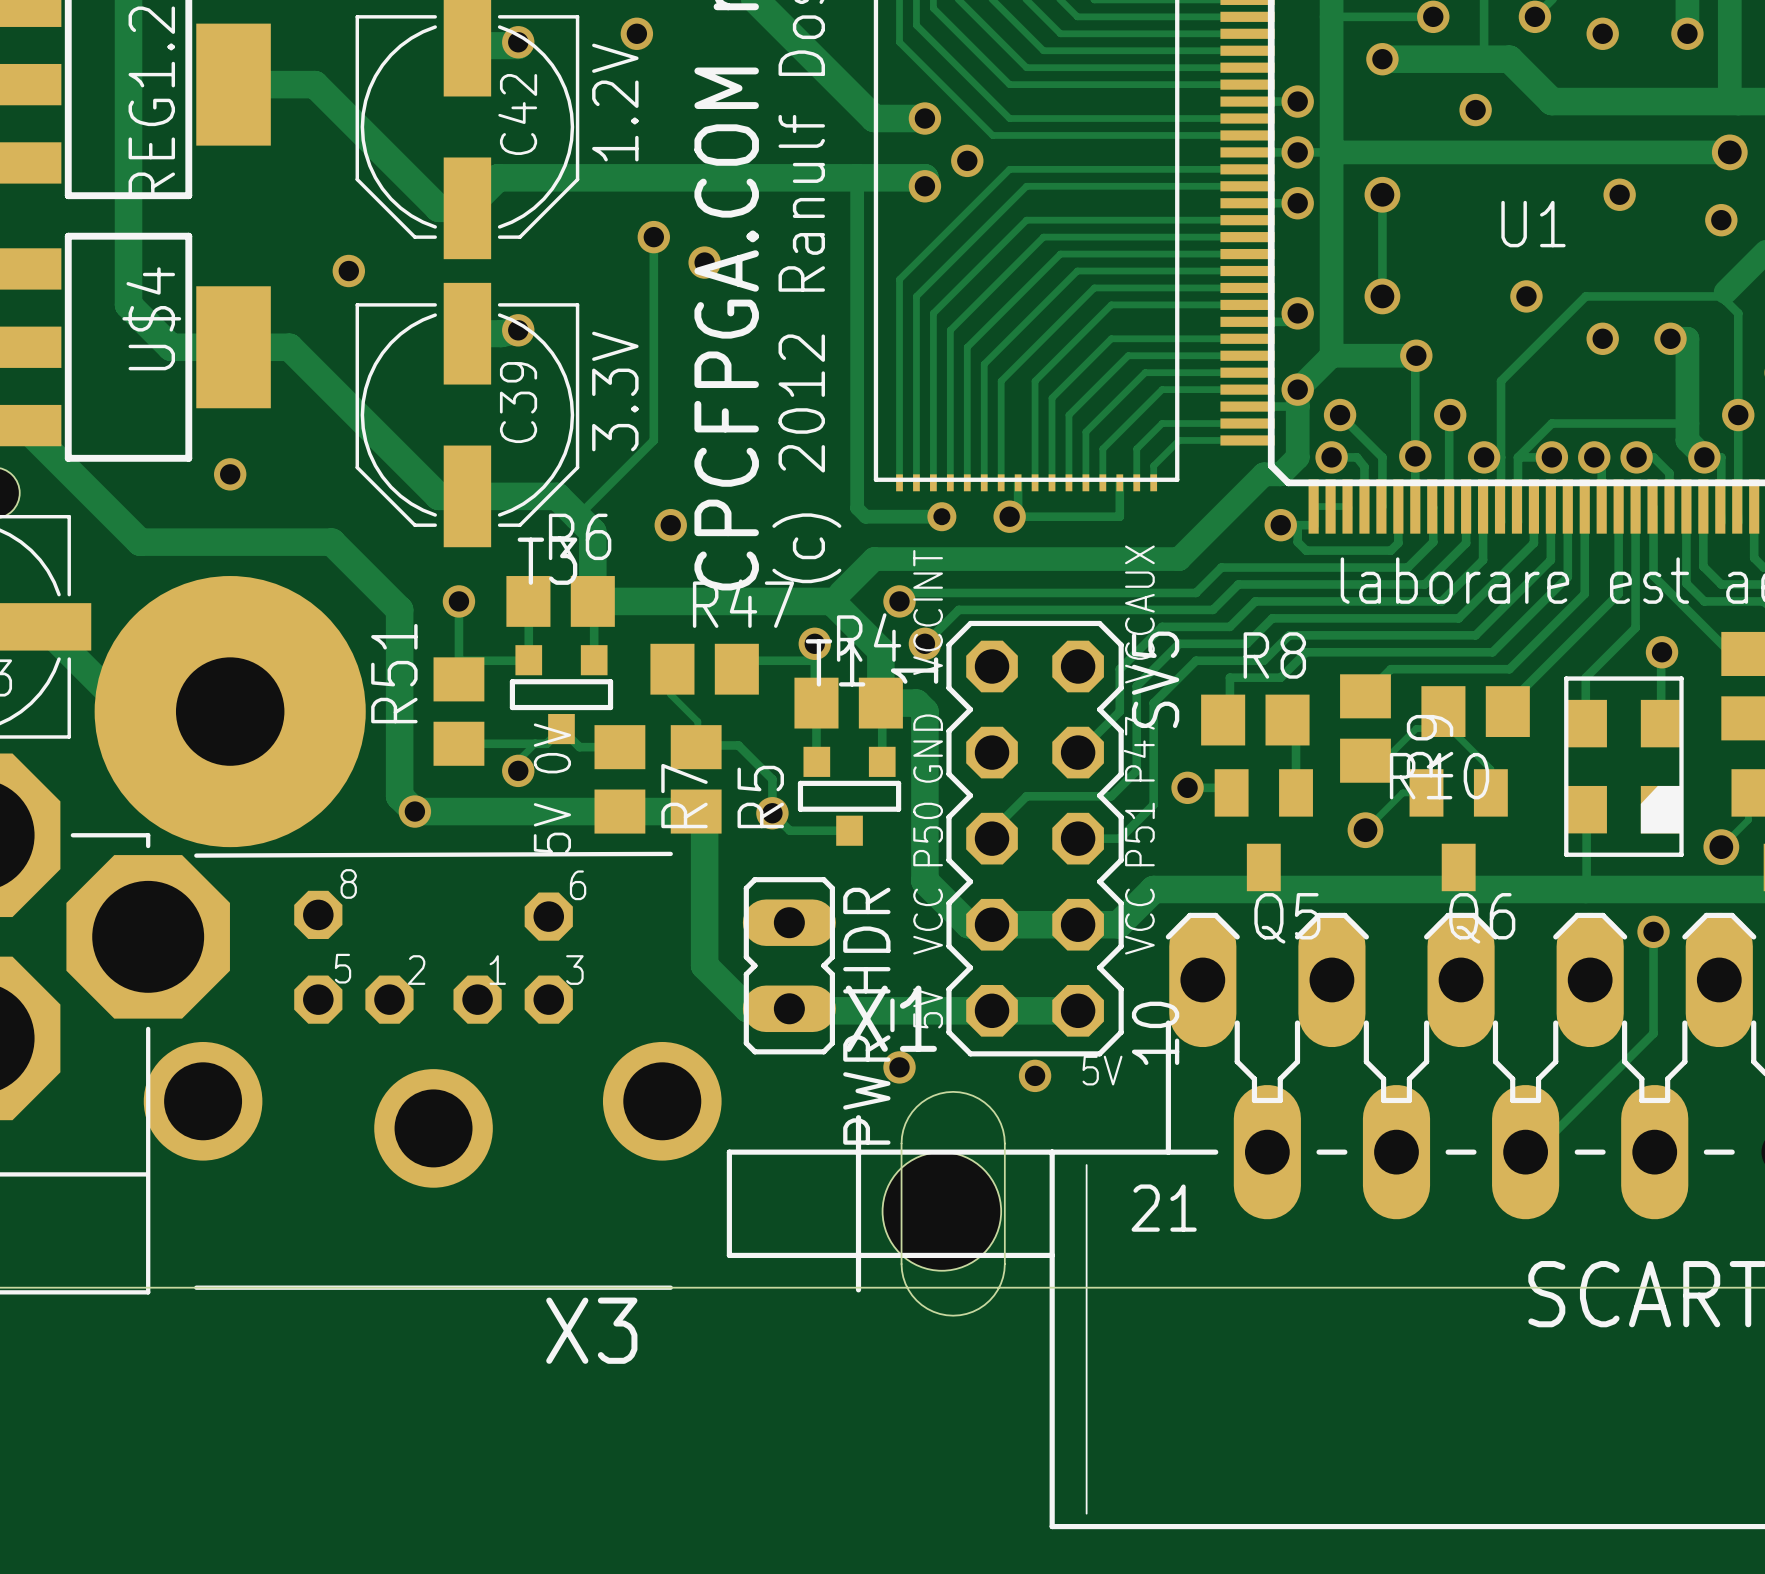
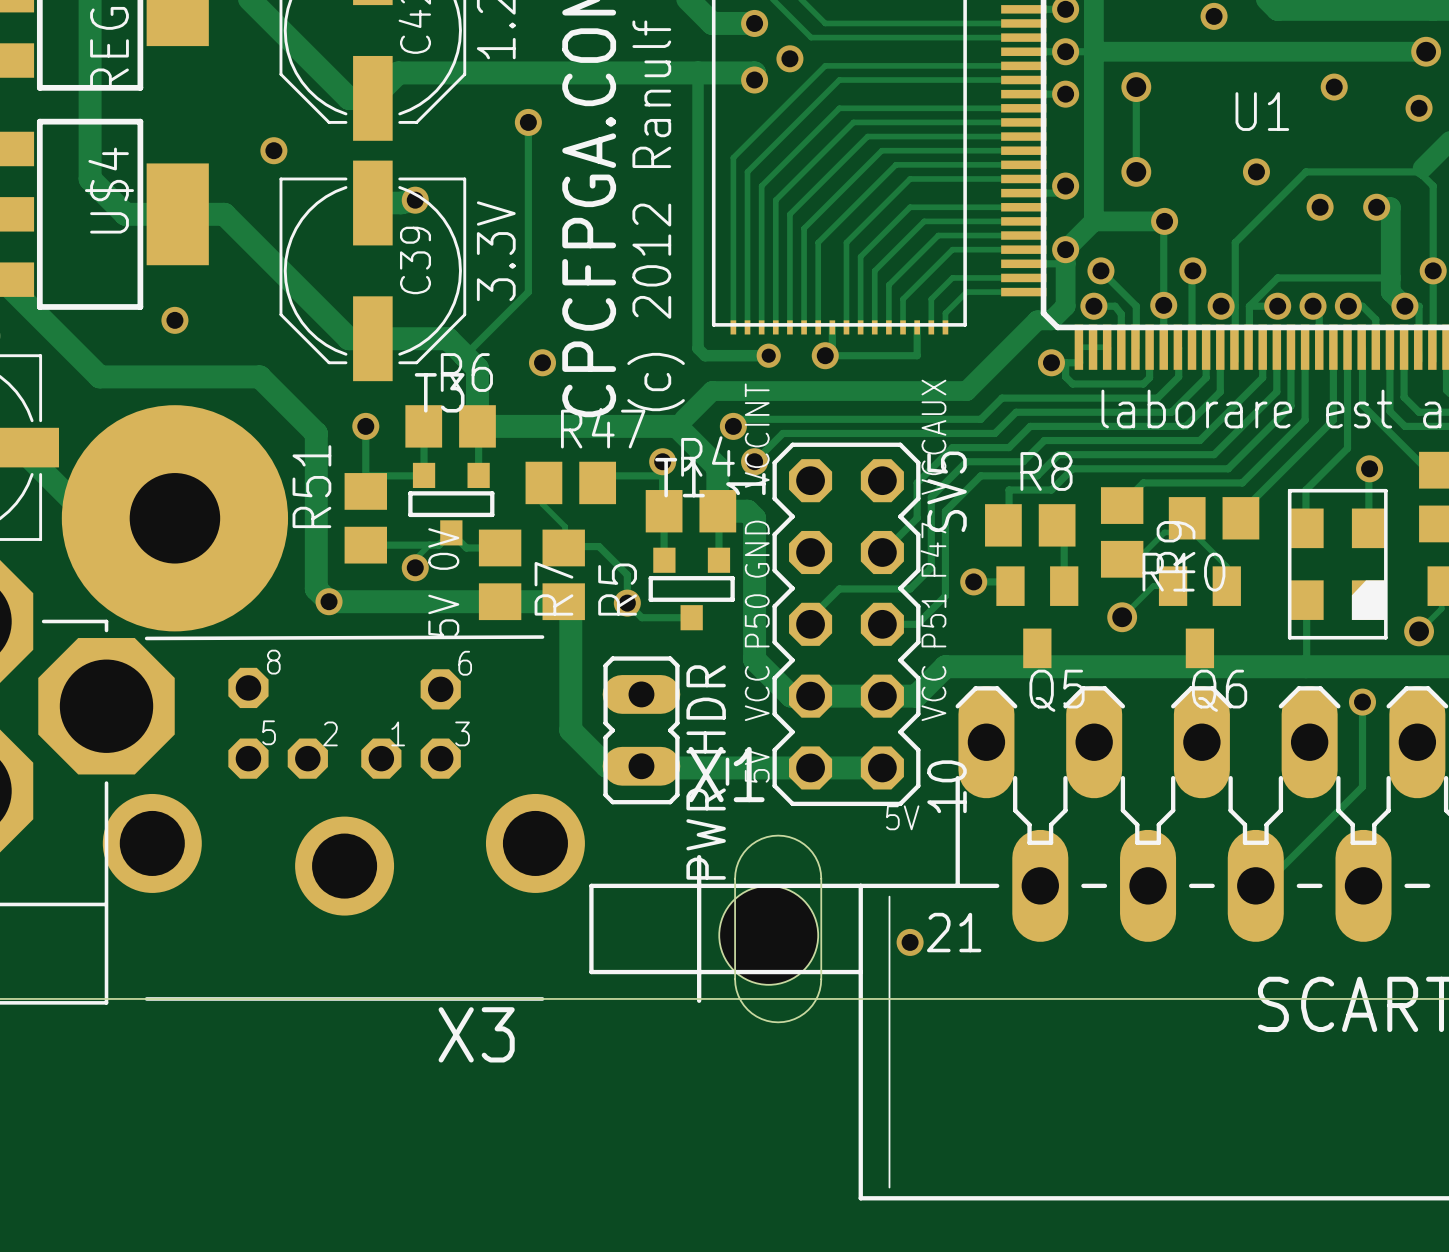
via: (704, 262) -> none
via: (899, 1067) -> none
via: (1035, 1075) -> none
via: none -> (910, 942)

